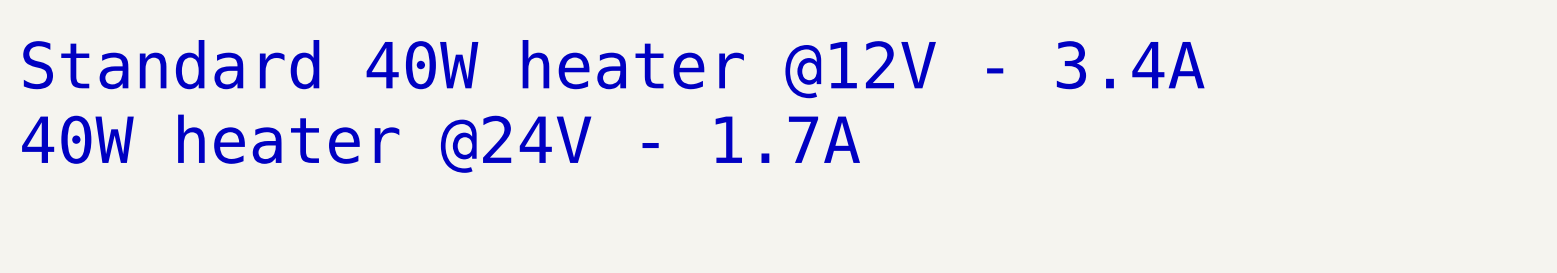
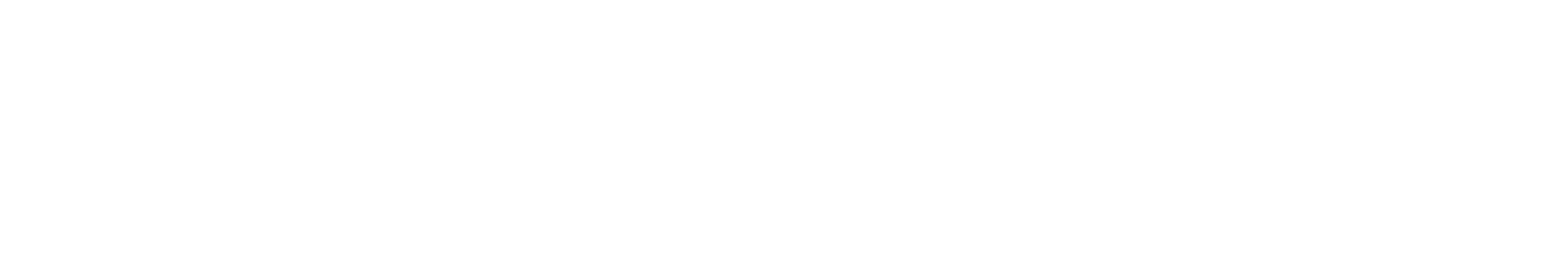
text: Standard 40W heater @12V - 3.4A (613, 69) -> none
text: 40W heater @24V - 1.7A (441, 143) -> none

